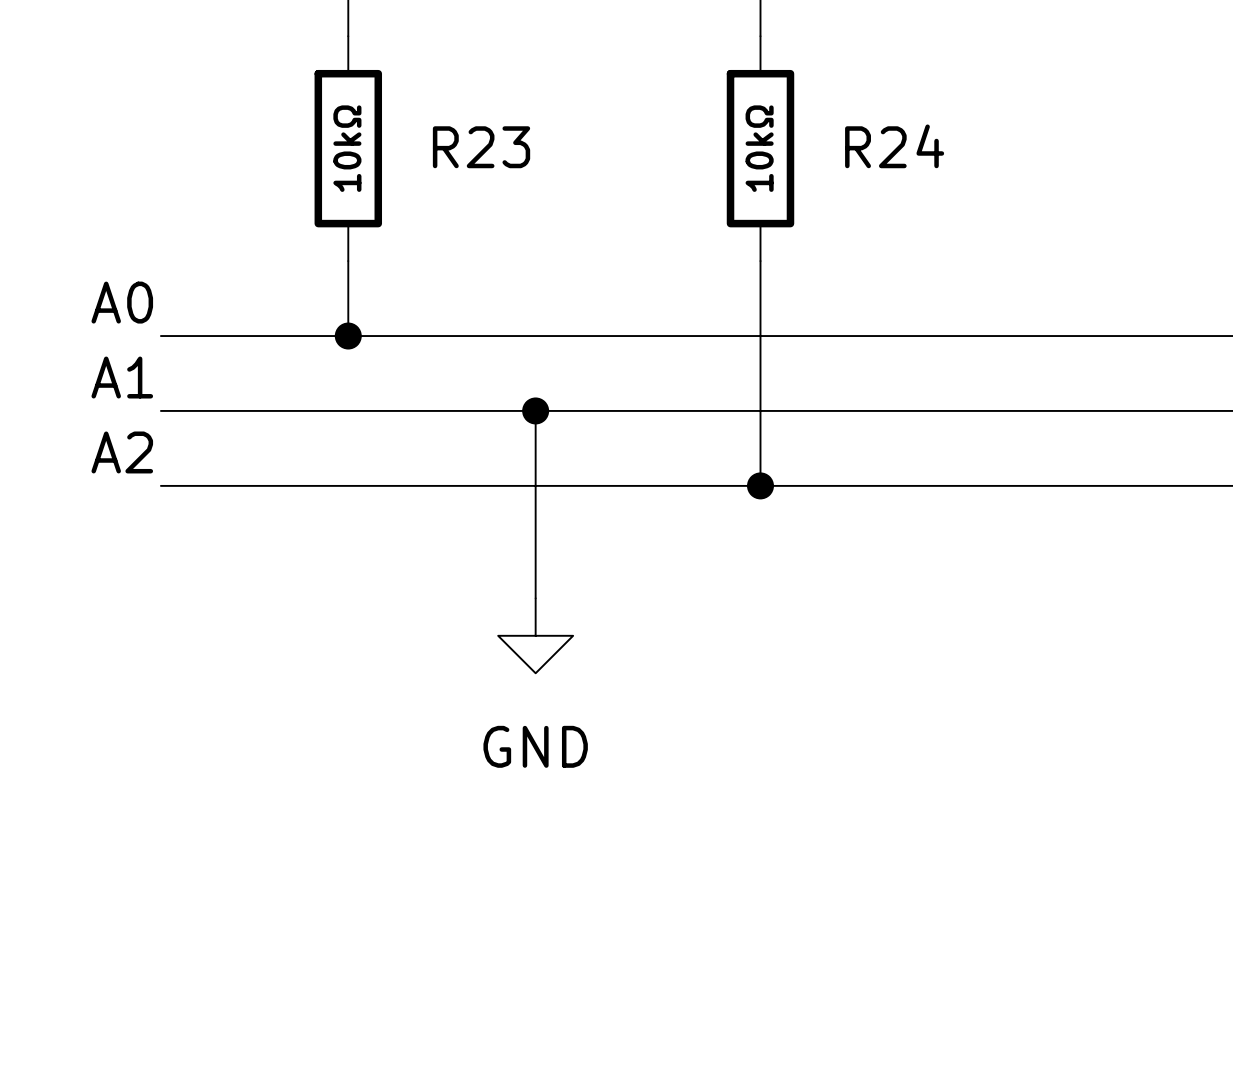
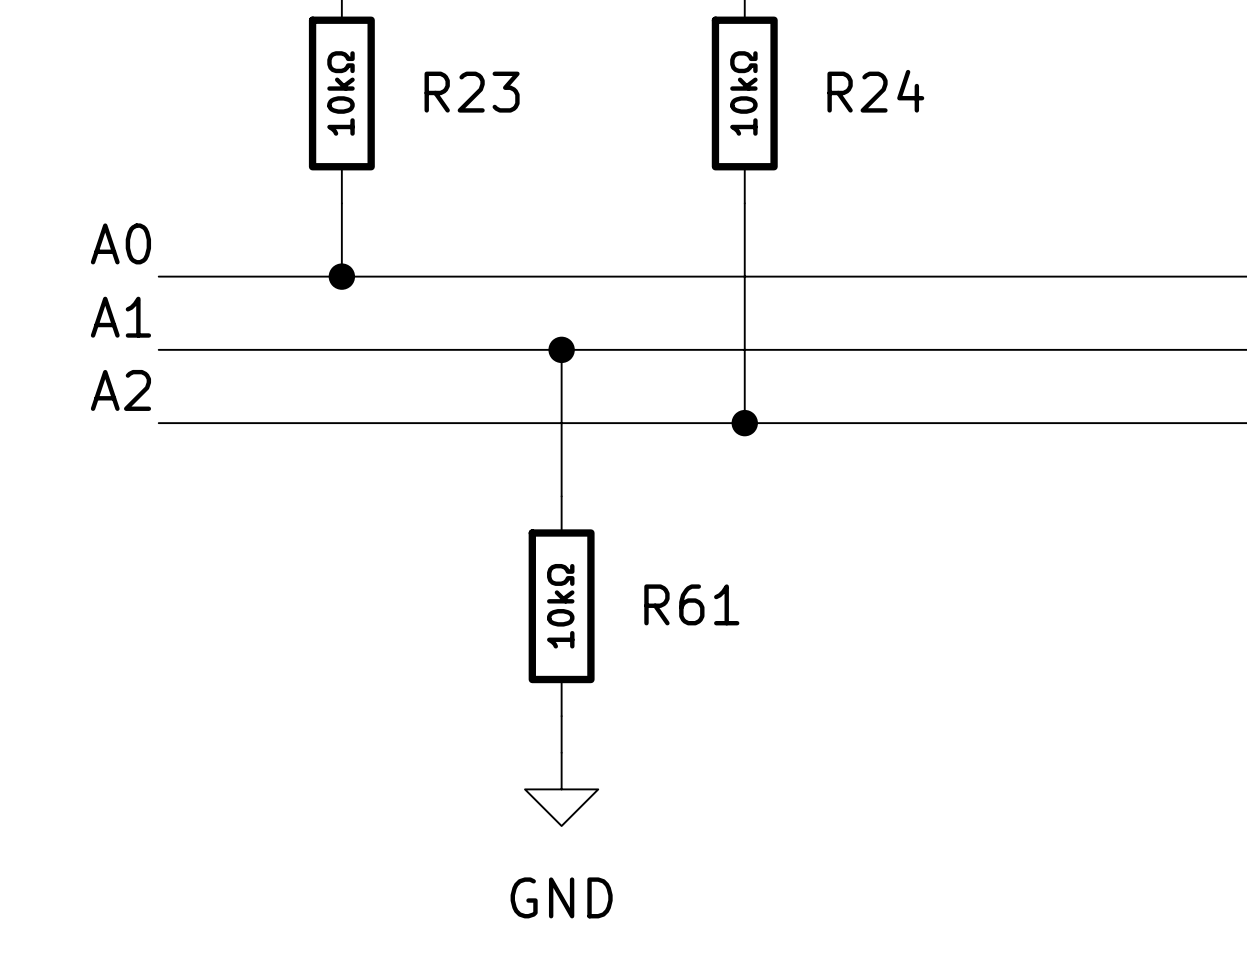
wire: (535, 410) (535, 598) -> none
junction position: (535, 410) -> (561, 349)
wire: none -> (561, 349) (561, 496)
power symbol position: GND (535, 635) -> GND (561, 789)
R61: none -> 10kΩ (561, 606)
wire: none -> (561, 716) (561, 752)

